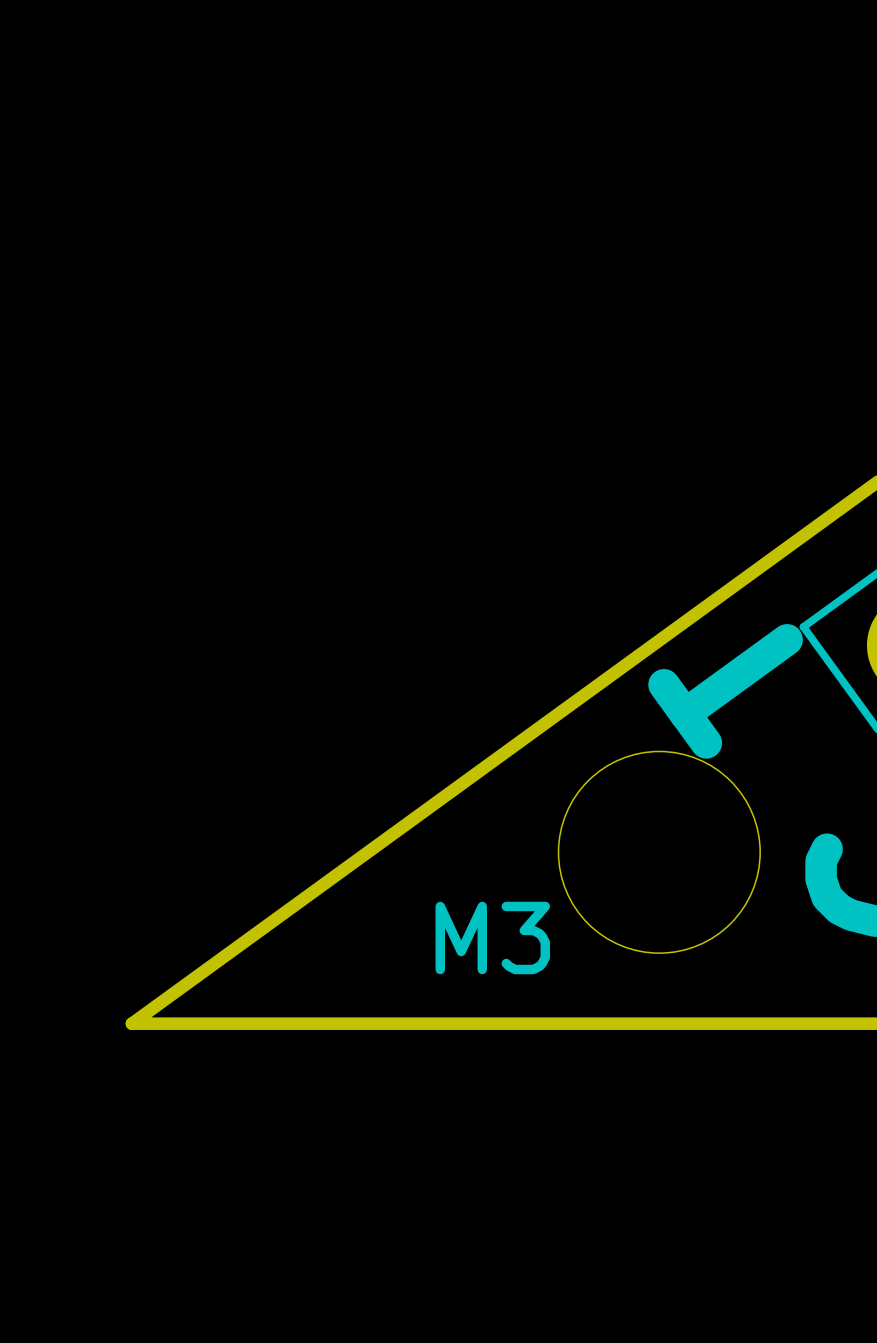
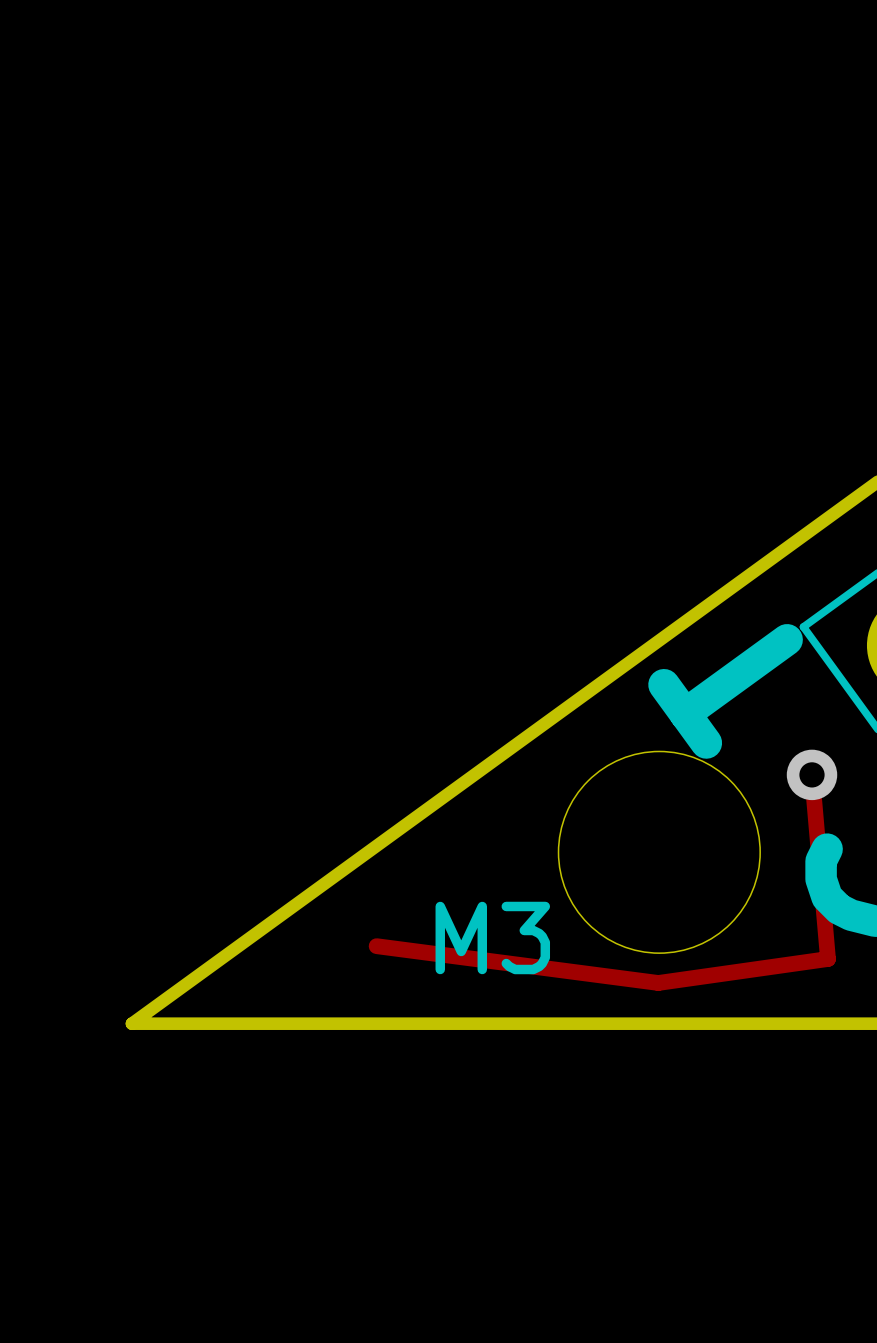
track: none -> (812, 774) (828, 958) (658, 982) (376, 946)
via: none -> (812, 774)

